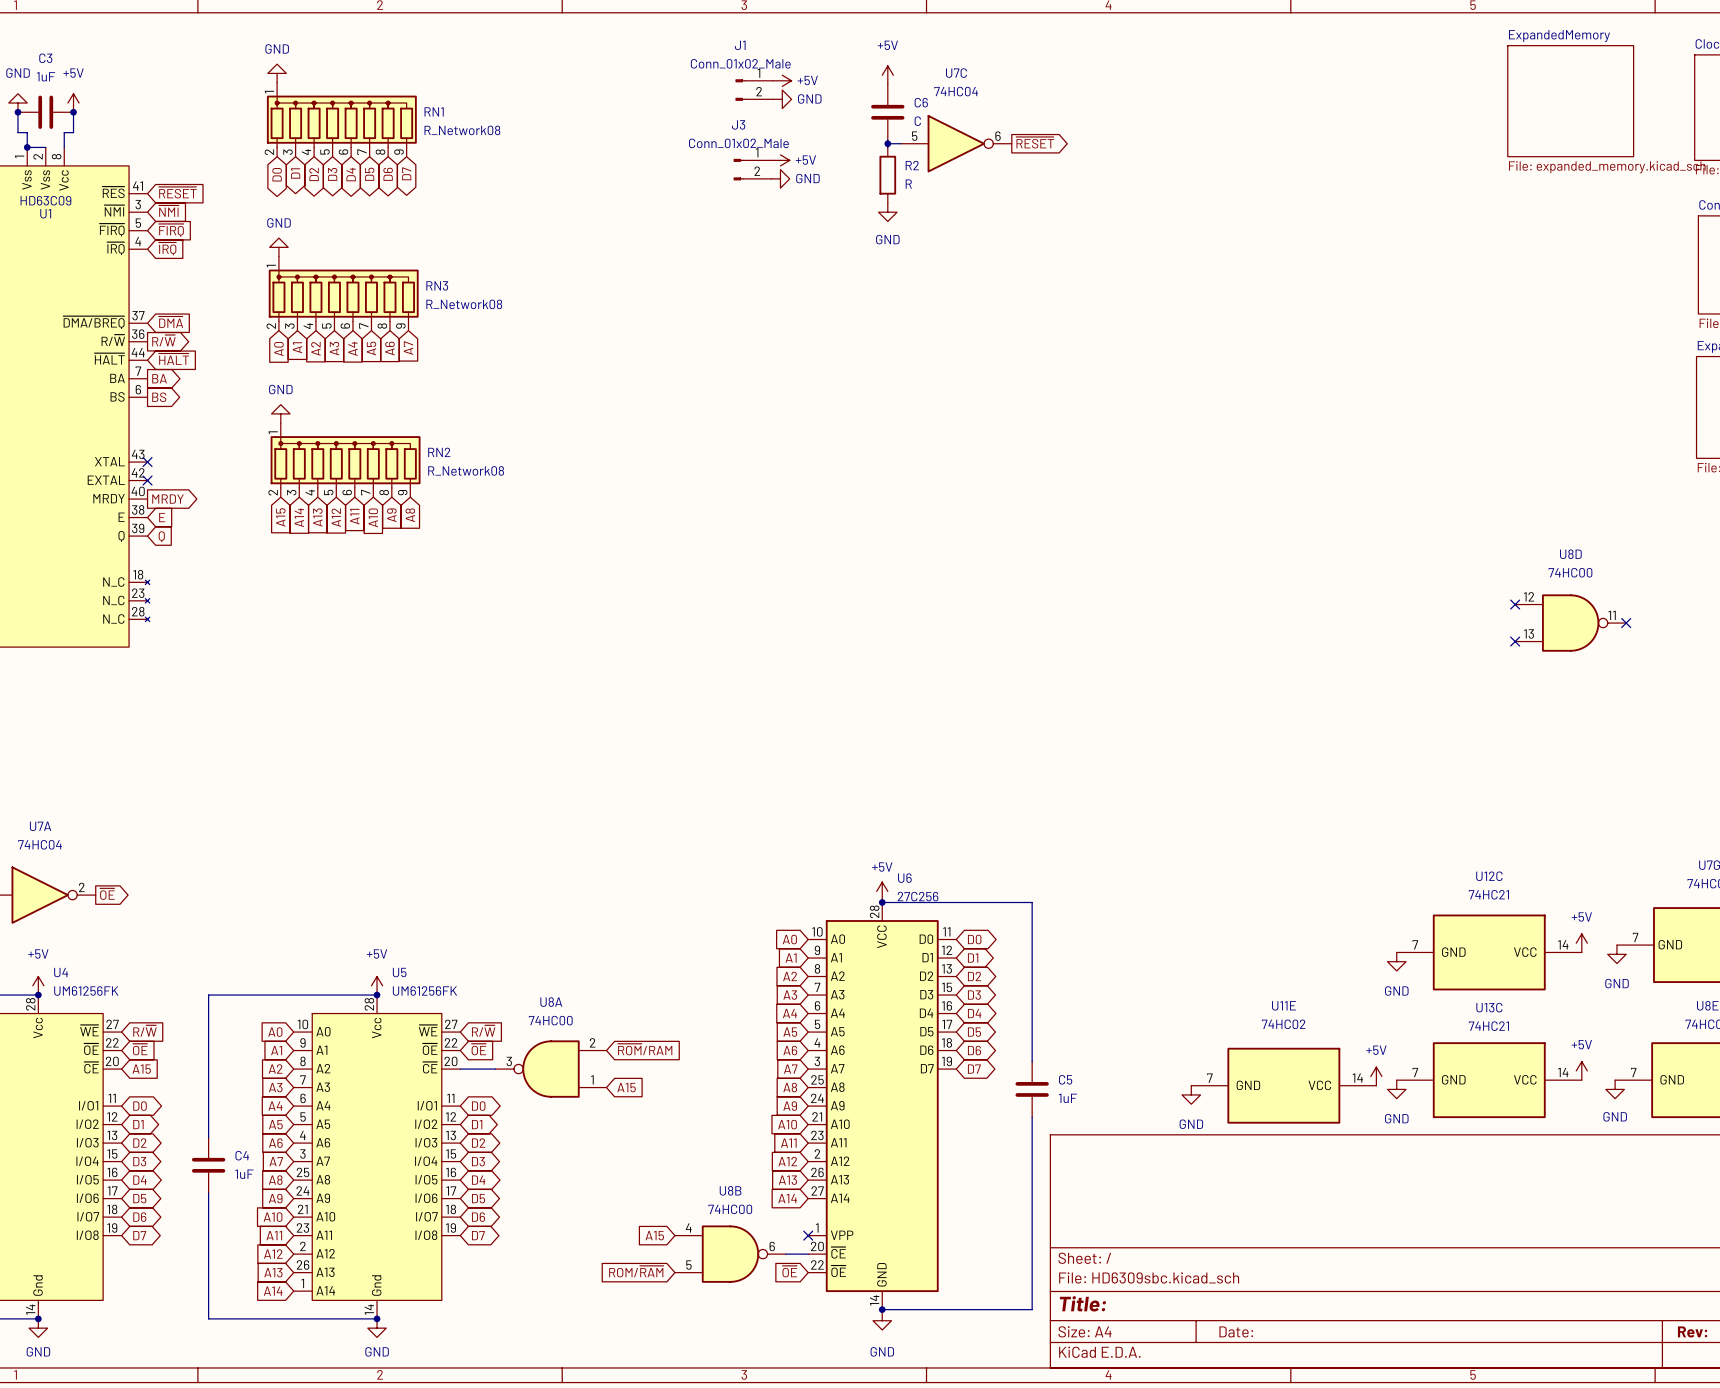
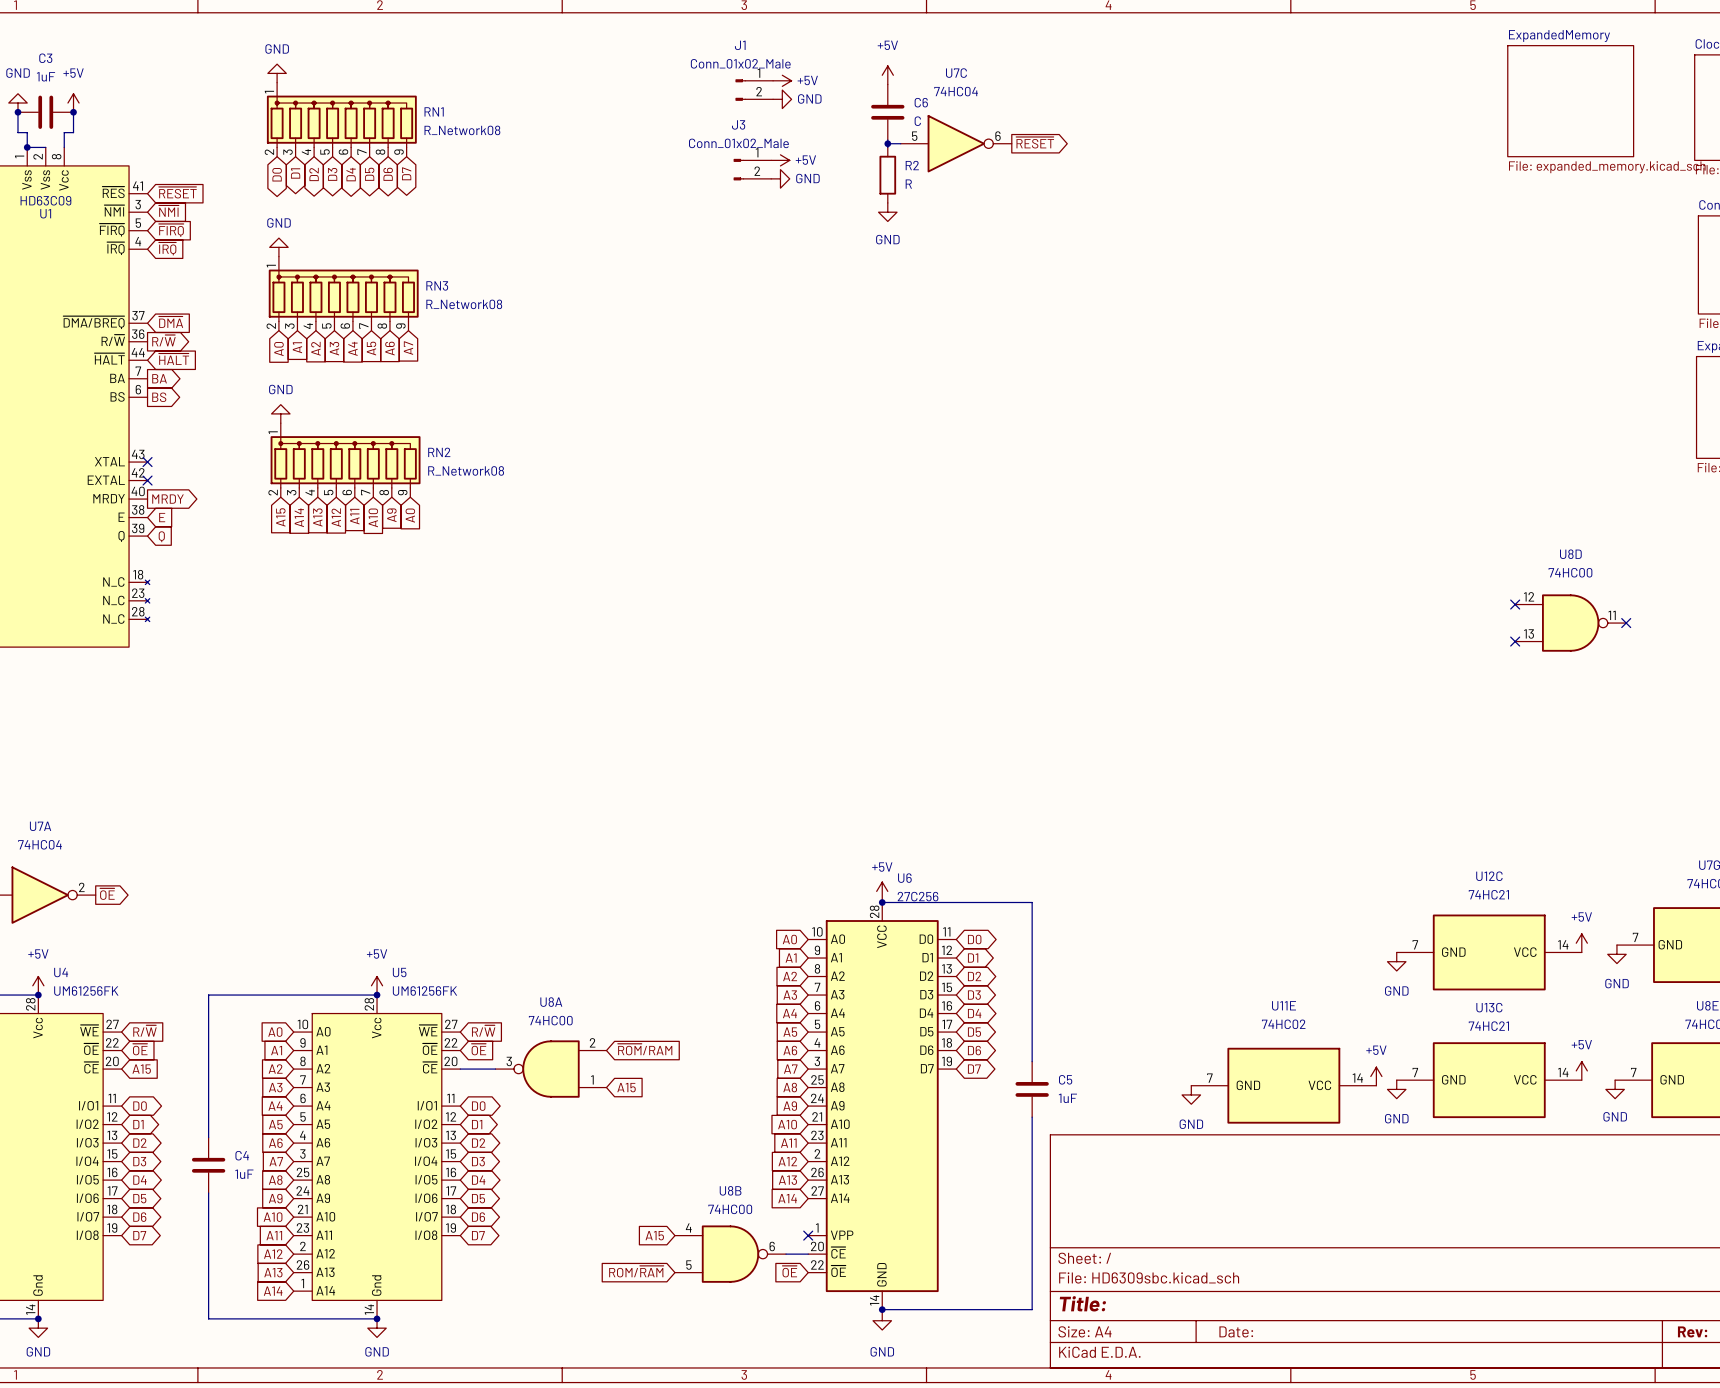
global label: A8 (410, 515) -> A0 (410, 515)

